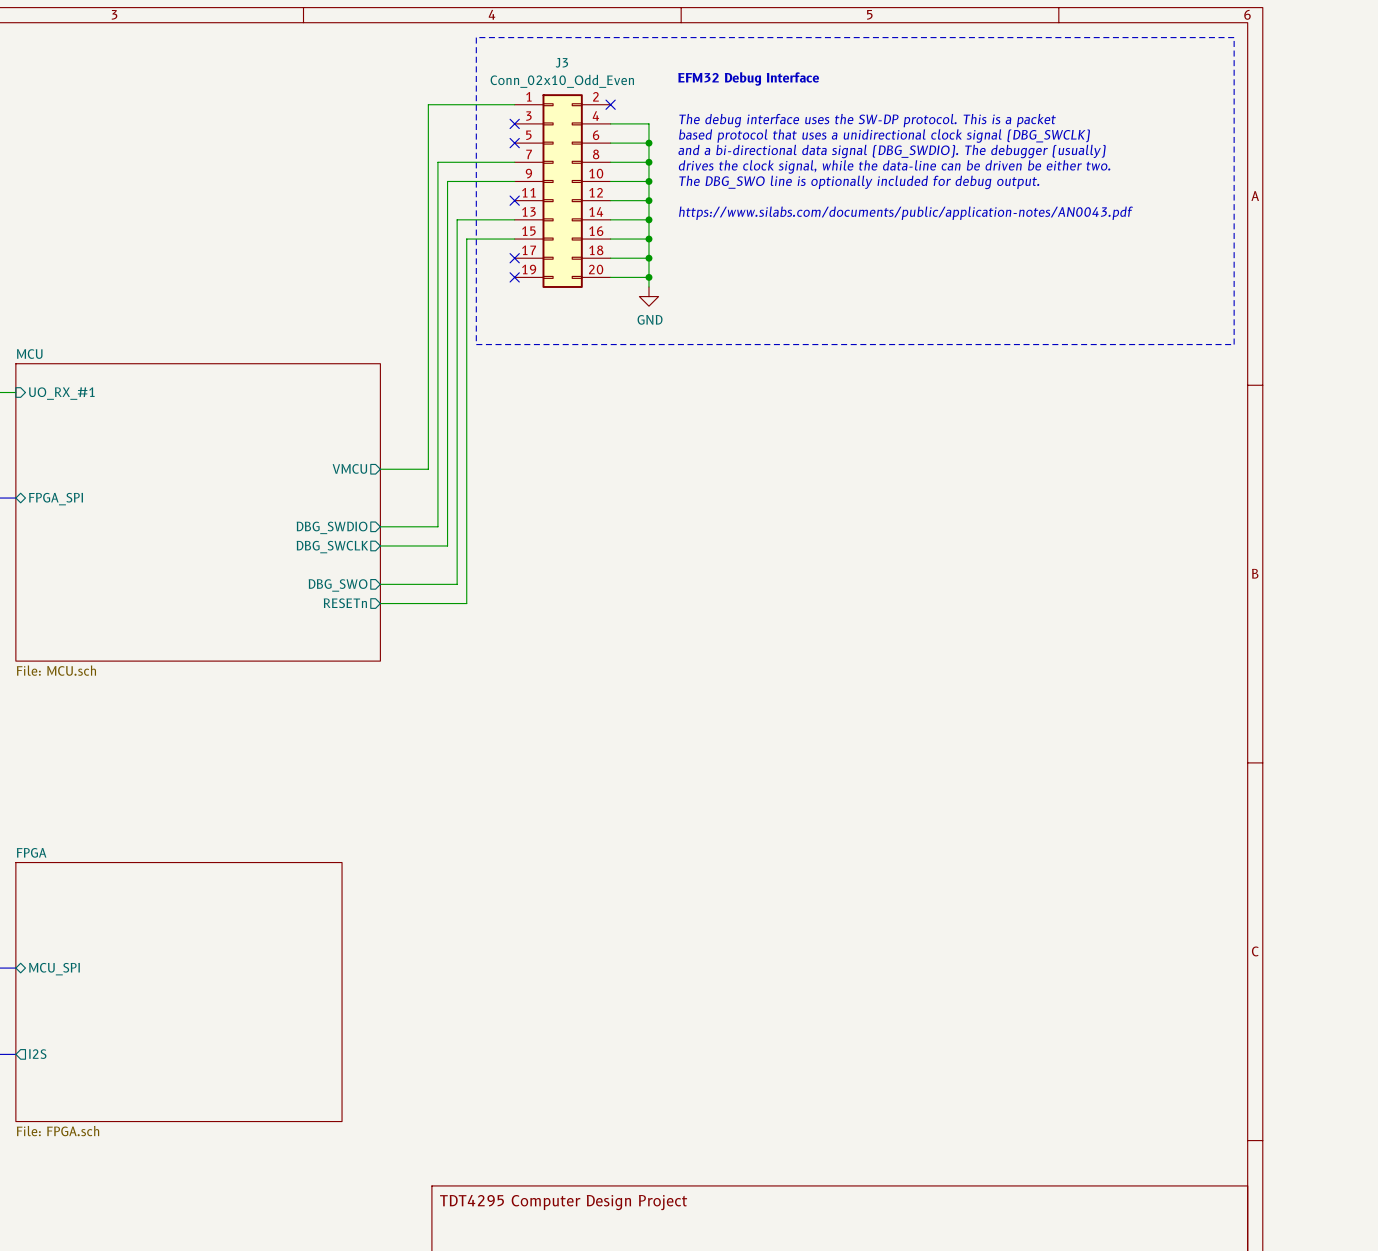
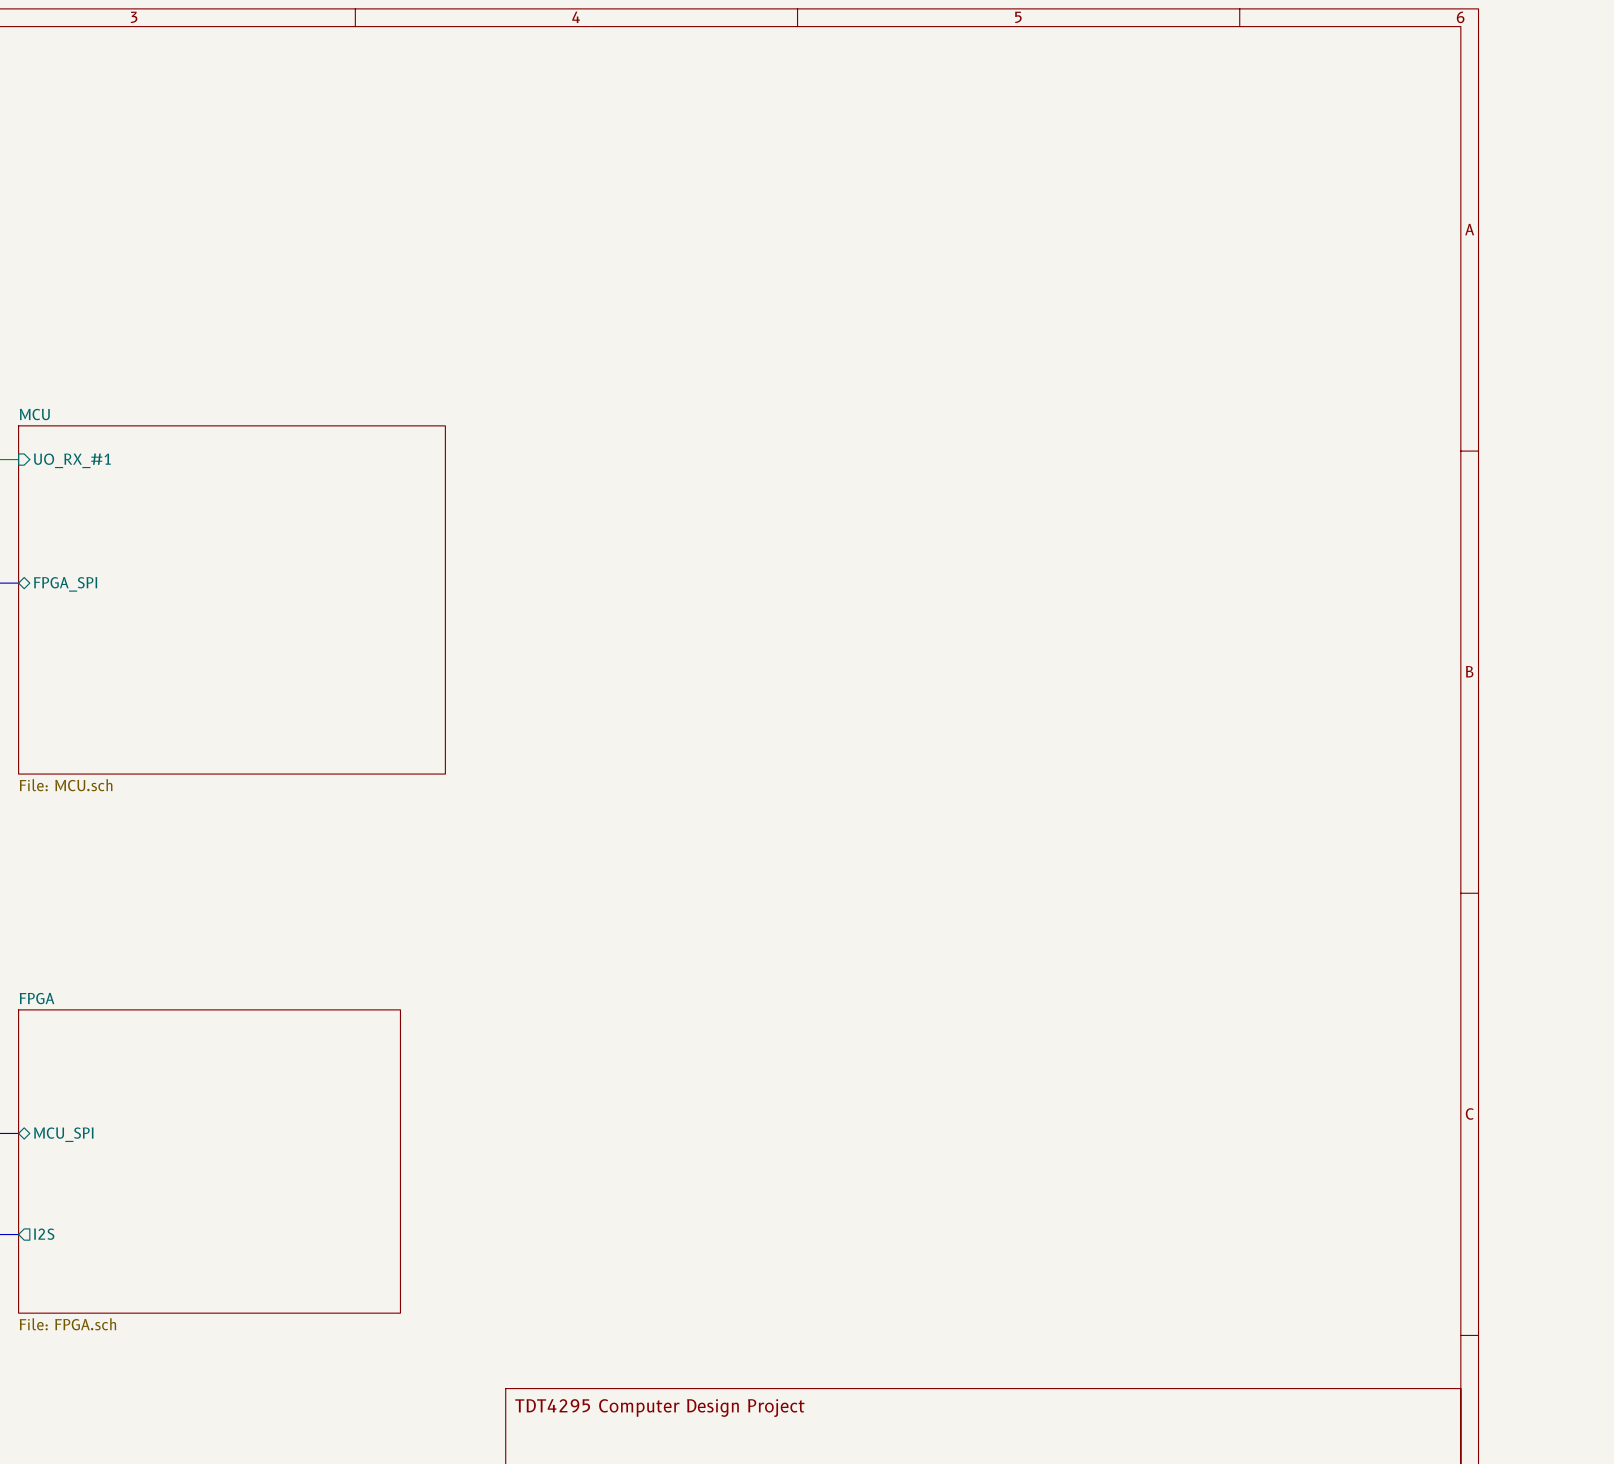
line: (476, 37) (1234, 37) (1234, 344) (476, 344) (476, 37) -> none
text: EFM32 Debug Interface (748, 78) -> none
wire: (514, 104) (428, 104) (428, 469) (380, 469) -> none
no-connect mark: (610, 104) -> none
text: The debug interface uses the SW-DP protocol. This is a packet (867, 120) -> none
no-connect mark: (514, 123) -> none
wire: (610, 123) (648, 123) (648, 286) -> none
text: based protocol that uses a unidirectional clock signal (DBG_SWCLK) (884, 136) -> none
no-connect mark: (514, 143) -> none
wire: (610, 143) (648, 143) -> none
junction: (648, 143) -> none
text: and a bi-directional data signal (DBG_SWDIO). The debugger (usually) (892, 151) -> none
wire: (514, 162) (437, 162) (437, 526) (380, 526) -> none
wire: (610, 162) (648, 162) -> none
junction: (648, 162) -> none
text: drives the clock signal, while the data-line can be driven be either two. (894, 166) -> none
wire: (514, 181) (447, 181) (447, 545) (380, 545) -> none
wire: (610, 181) (648, 181) -> none
junction: (648, 181) -> none
text: The DBG_SWO line is optionally included for debug output. (859, 182) -> none
J3: Conn_02x10_Odd_Even (562, 191) -> none
no-connect mark: (514, 200) -> none
wire: (610, 200) (648, 200) -> none
junction: (648, 200) -> none
text: https://www.silabs.com/documents/public/application-notes/AN0043.pdf (905, 213) -> none
wire: (514, 219) (457, 219) (457, 584) (380, 584) -> none
wire: (610, 219) (648, 219) -> none
junction: (648, 219) -> none
wire: (514, 239) (466, 239) (466, 603) (380, 603) -> none
wire: (610, 239) (648, 239) -> none
junction: (648, 239) -> none
no-connect mark: (514, 258) -> none
wire: (610, 258) (648, 258) -> none
junction: (648, 258) -> none
no-connect mark: (514, 277) -> none
wire: (610, 277) (648, 277) -> none
junction: (648, 277) -> none
power symbol: GND (648, 296) -> none
sheet pin: VMCU (349, 468) -> none
sheet pin: DBG_SWDIO (332, 527) -> none
sheet pin: DBG_SWCLK (332, 547) -> none
sheet pin: DBG_SWO (338, 585) -> none
sheet pin: RESETn (345, 603) -> none

